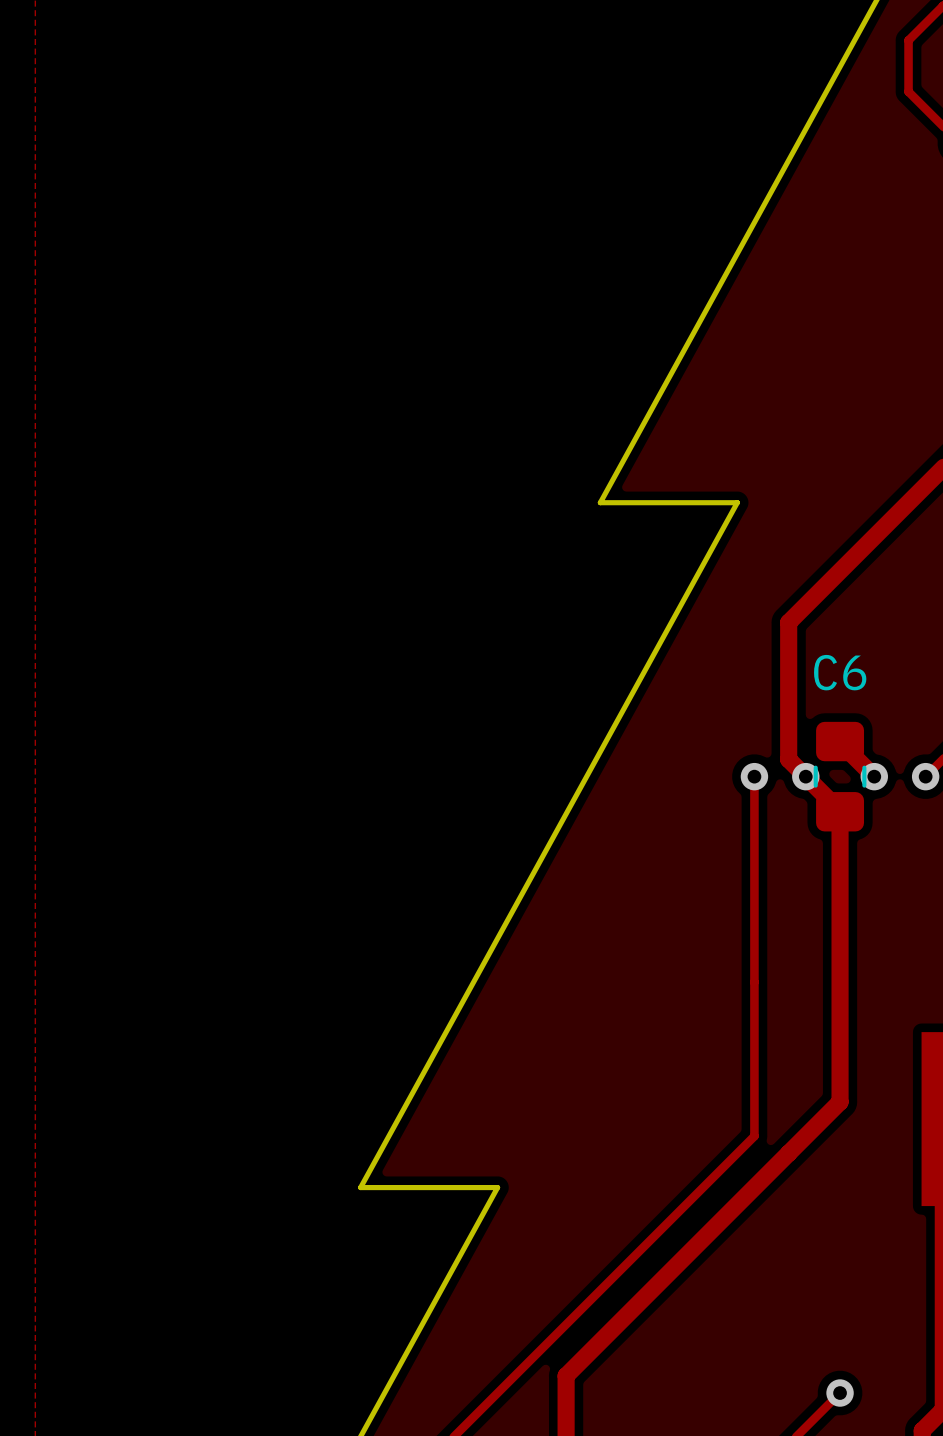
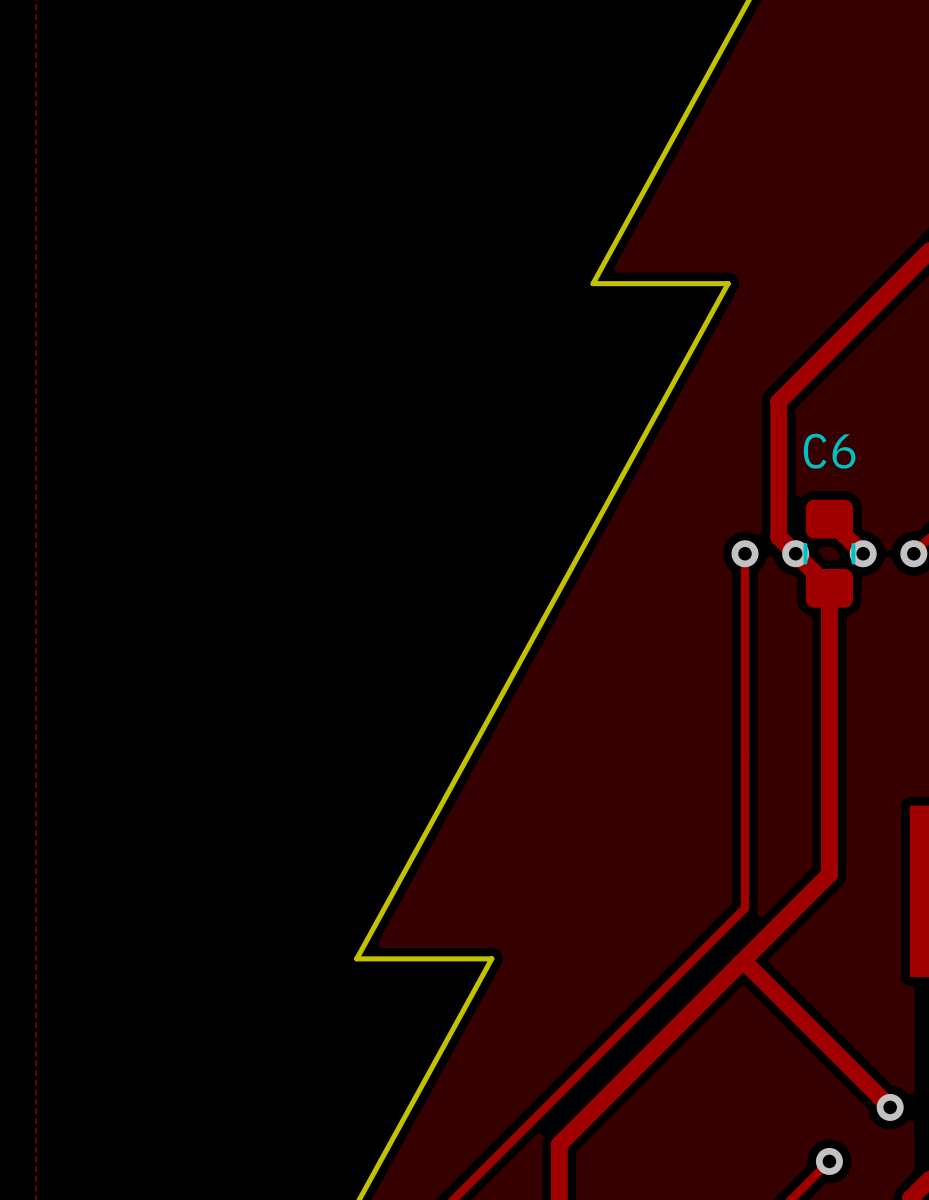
track: none -> (739, 963) (746, 963) (890, 1107)
via: none -> (890, 1107)

